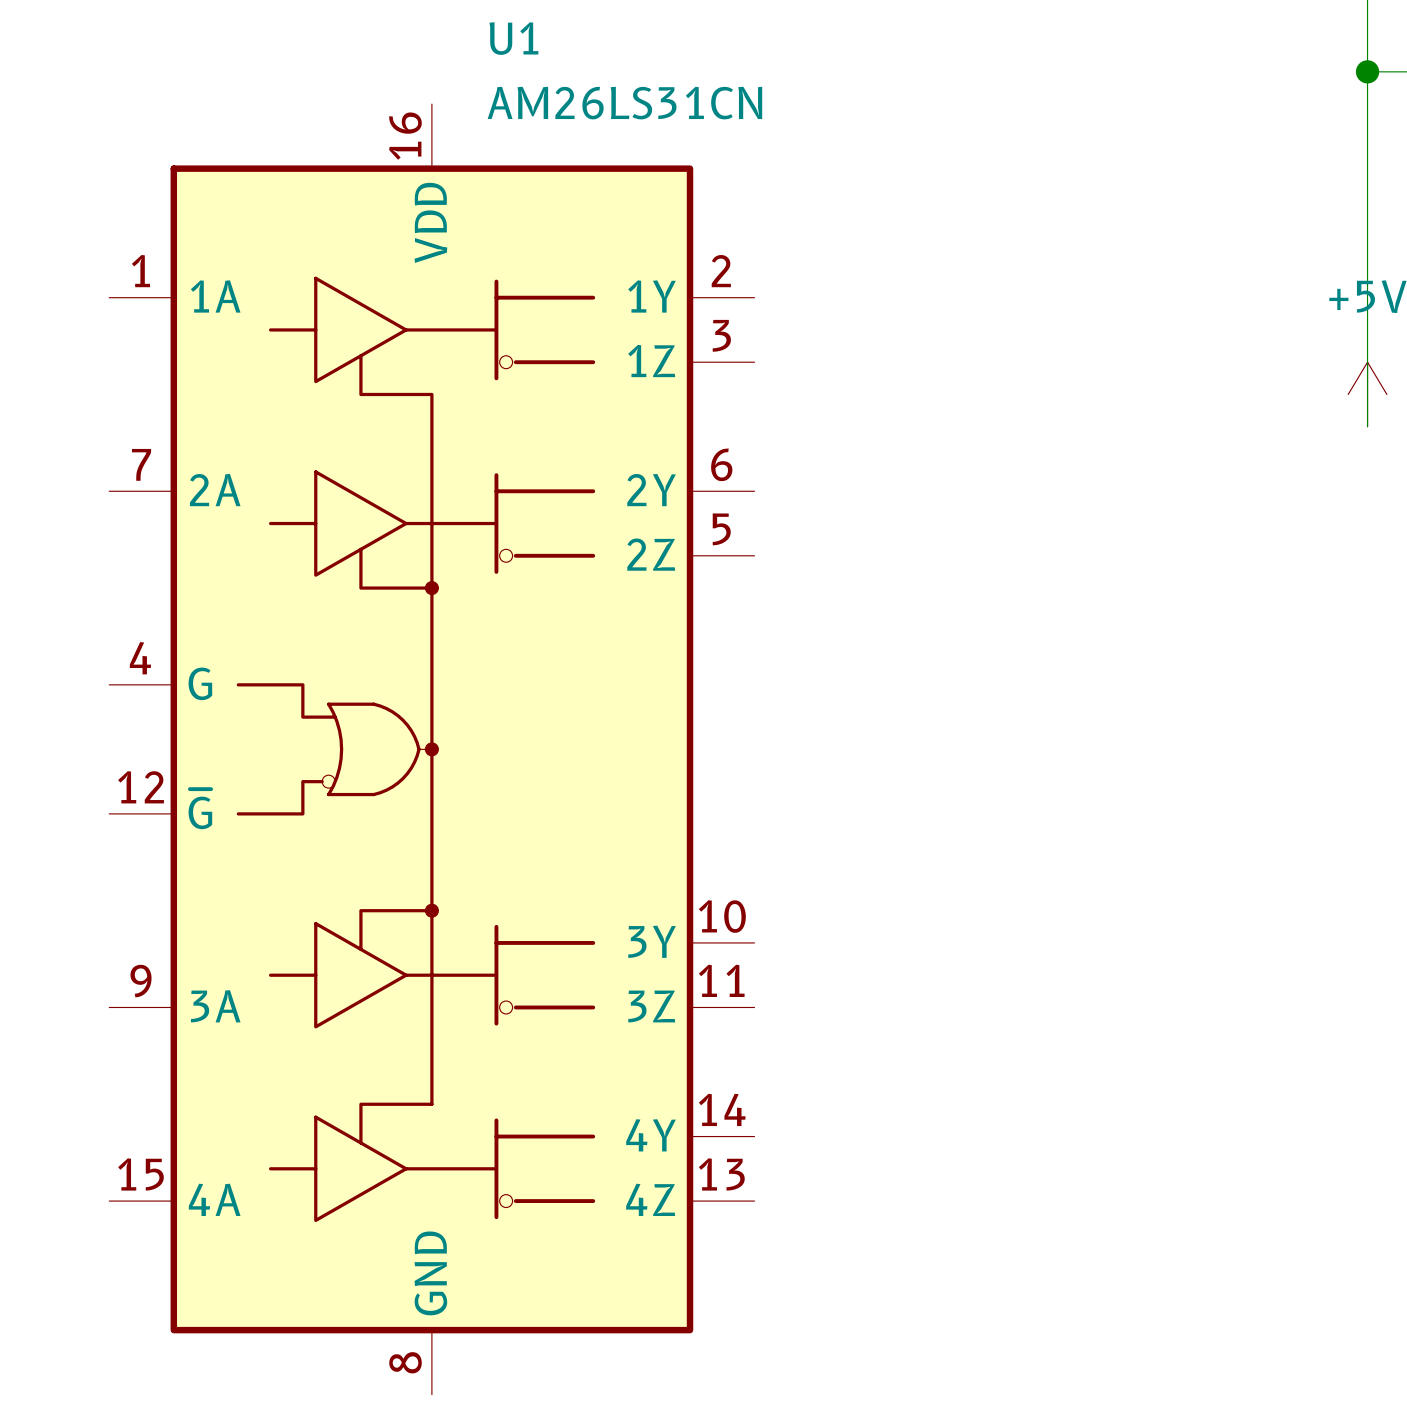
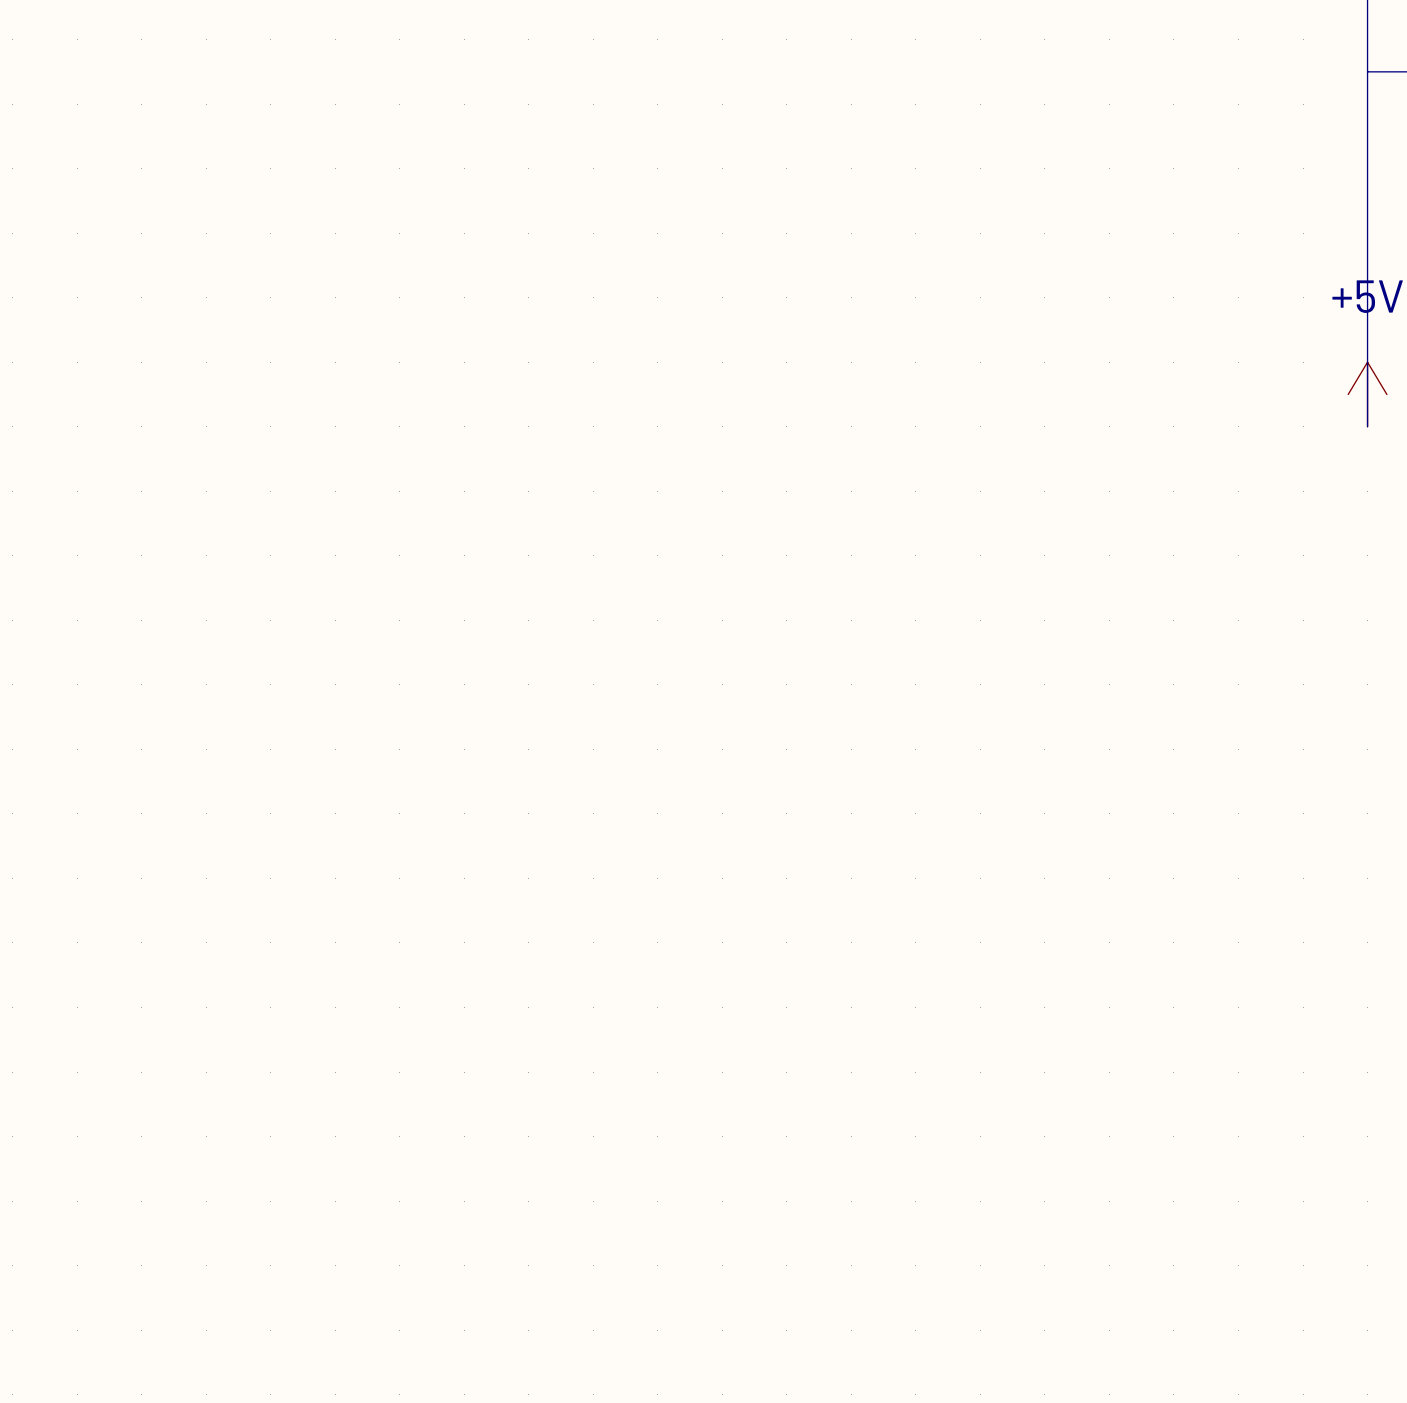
junction: (1367, 71) -> none
U1: AM26LS31CN (431, 749) -> none

